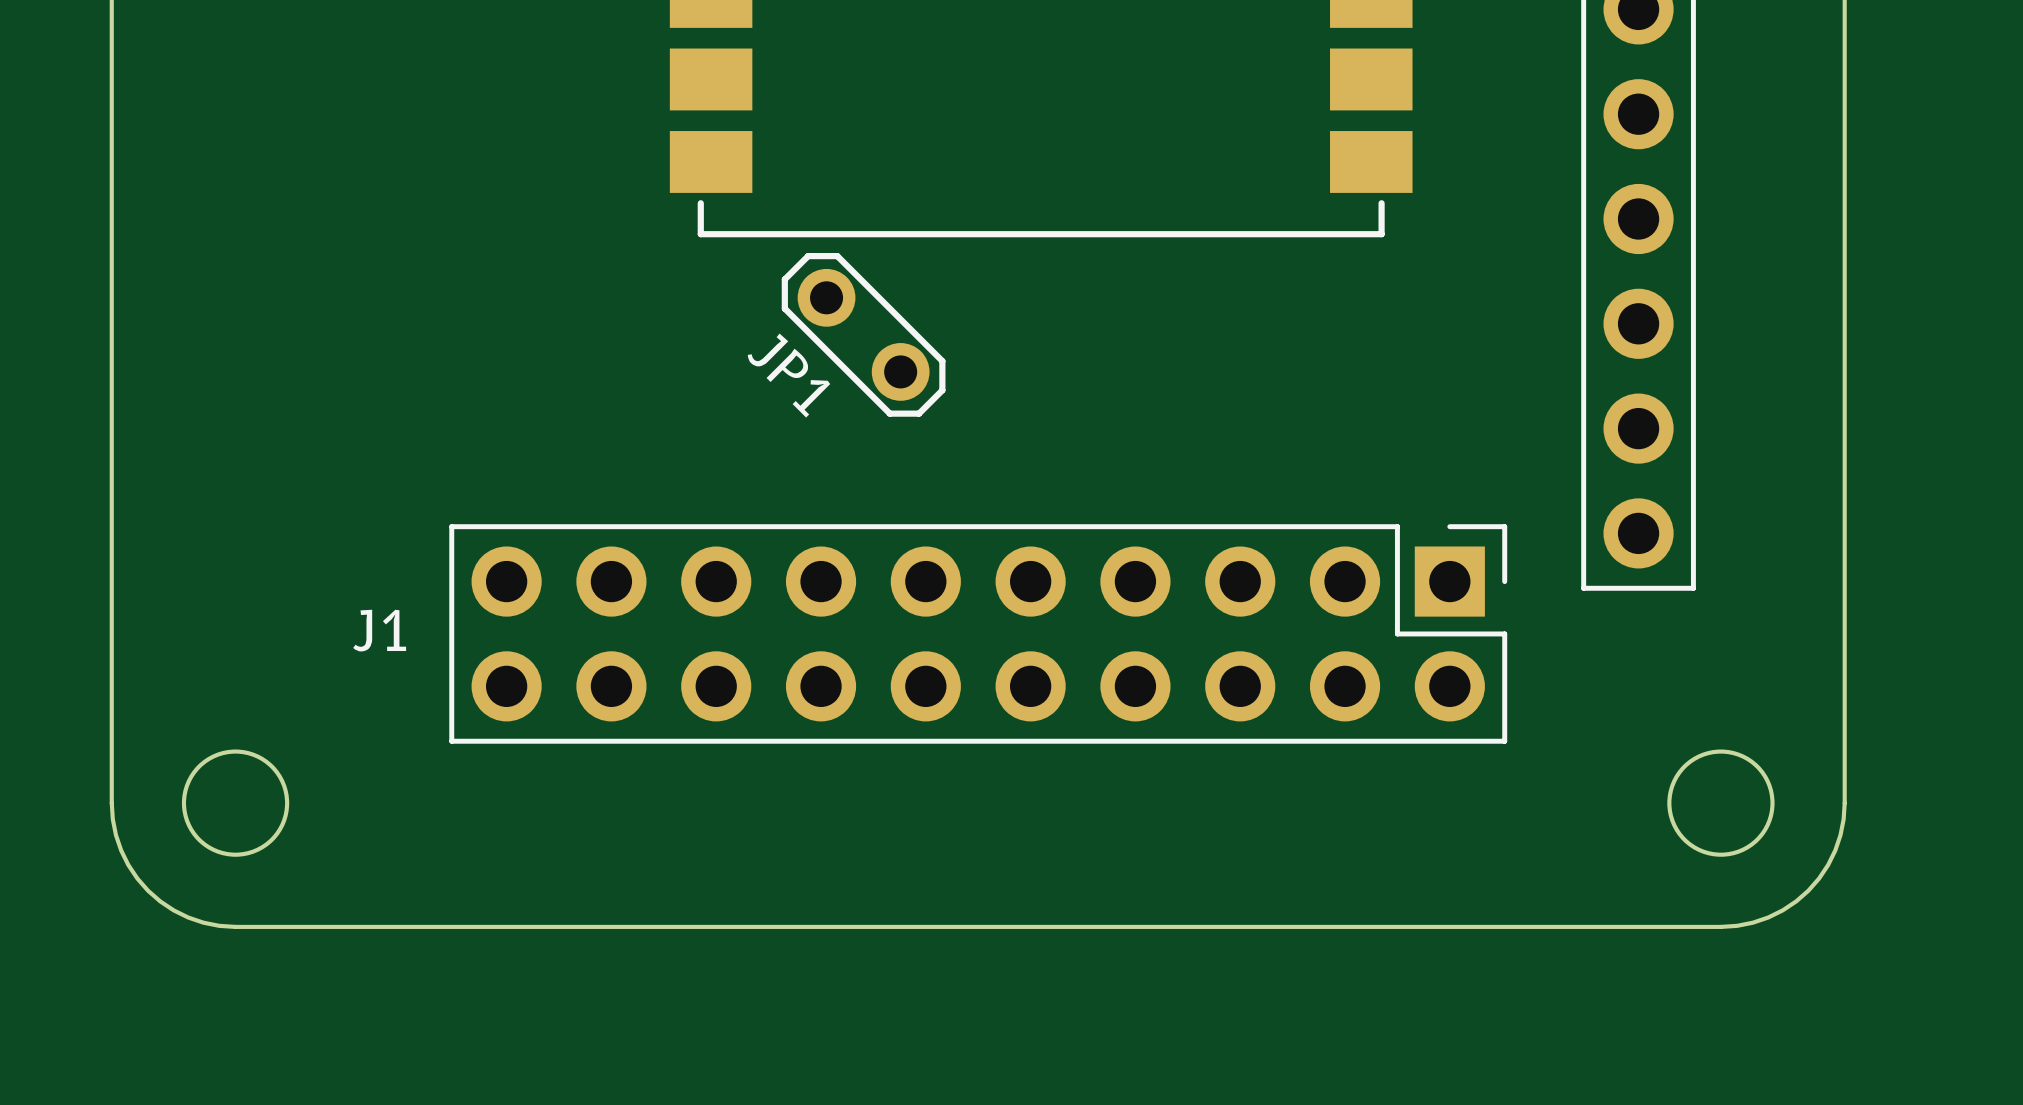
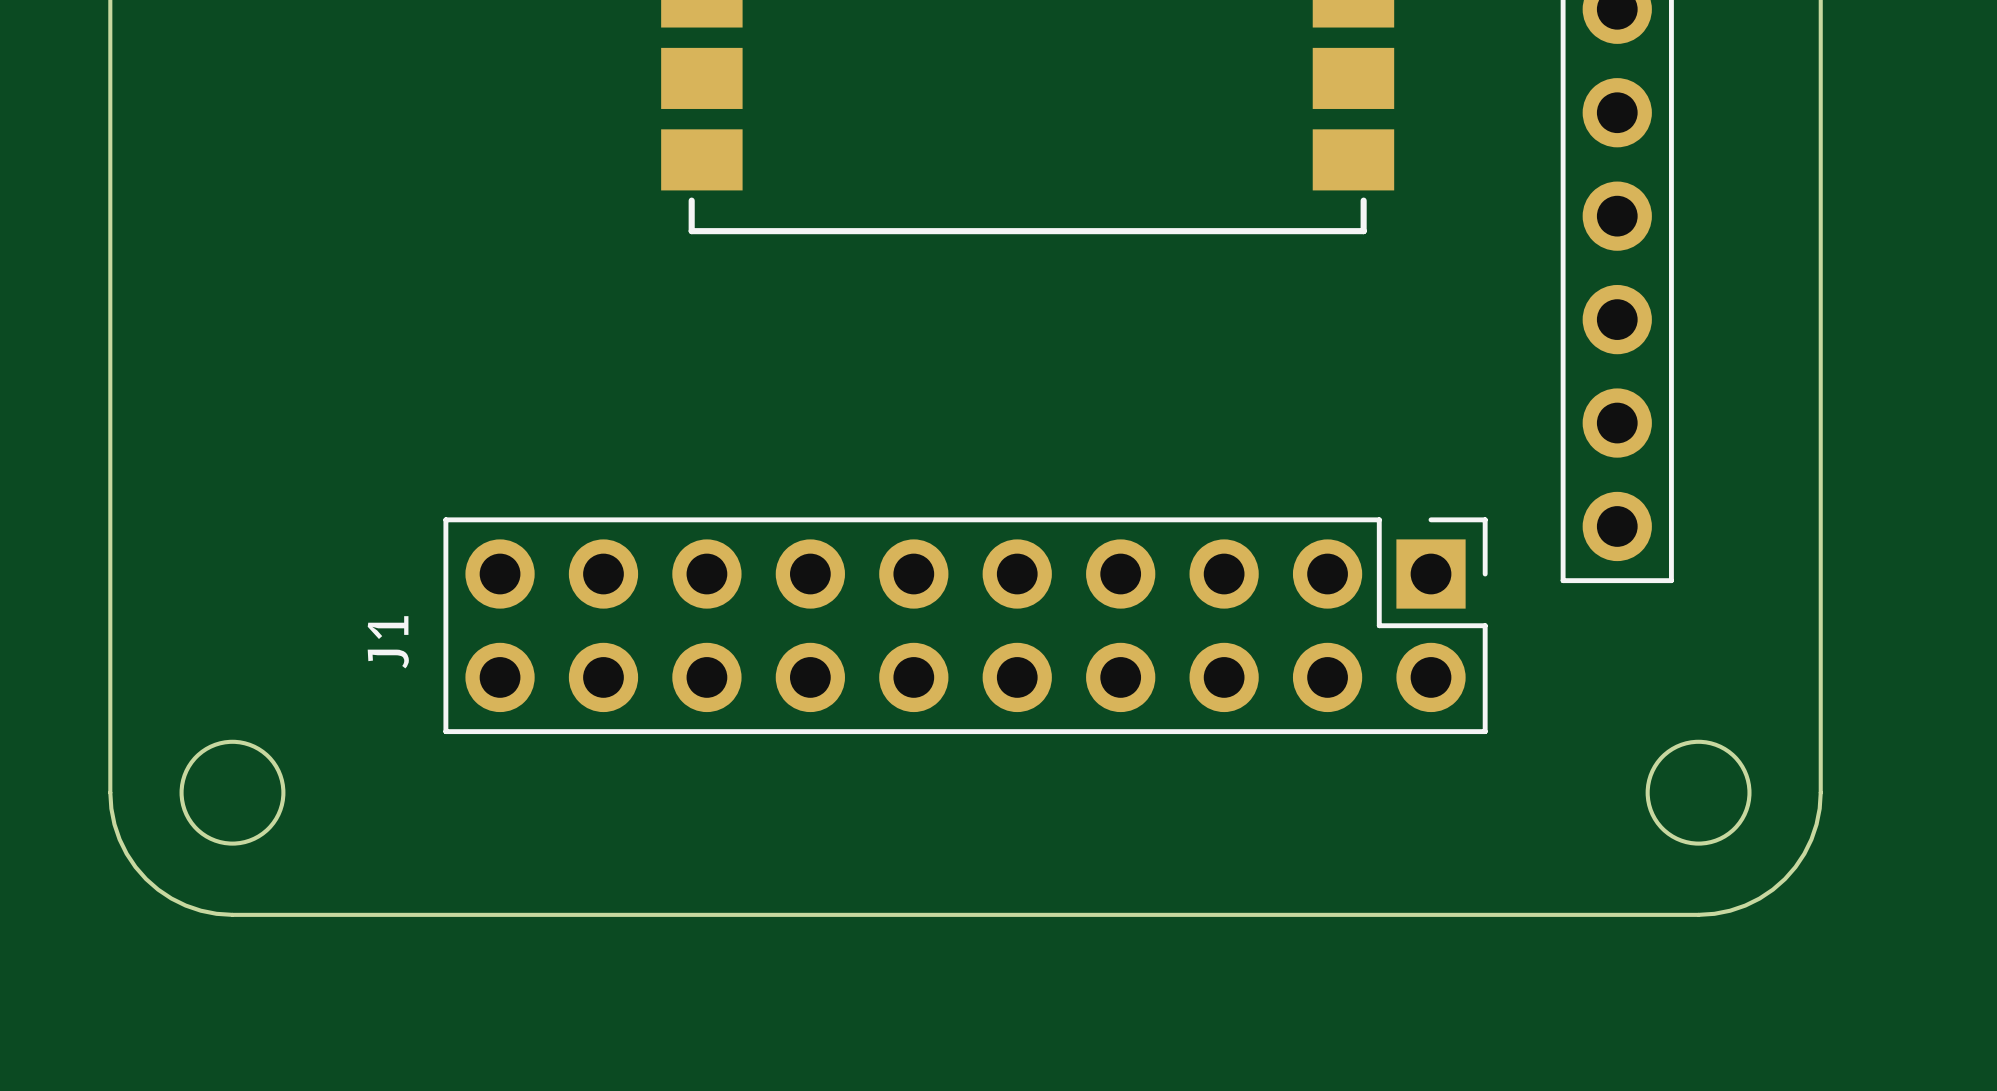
JP1: (863, 334) -> none
J1 name rotation: 0° (379, 630) -> 90° counterclockwise (388, 642)

